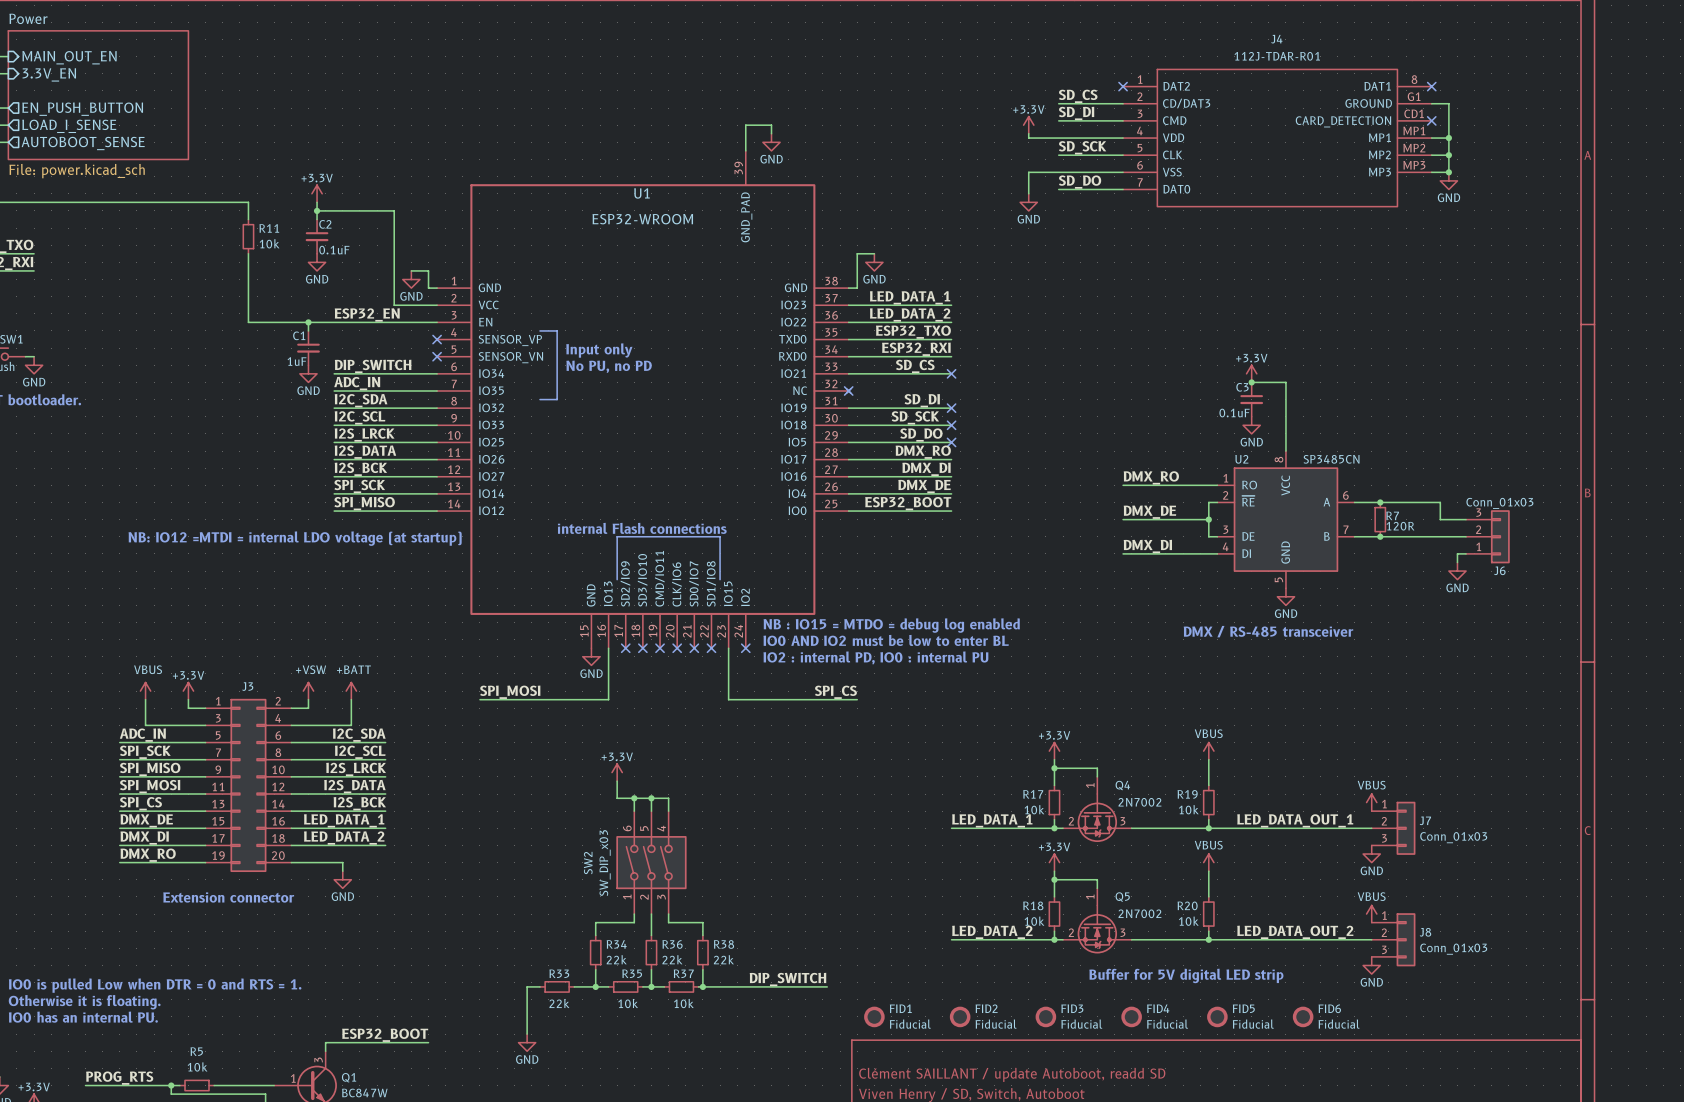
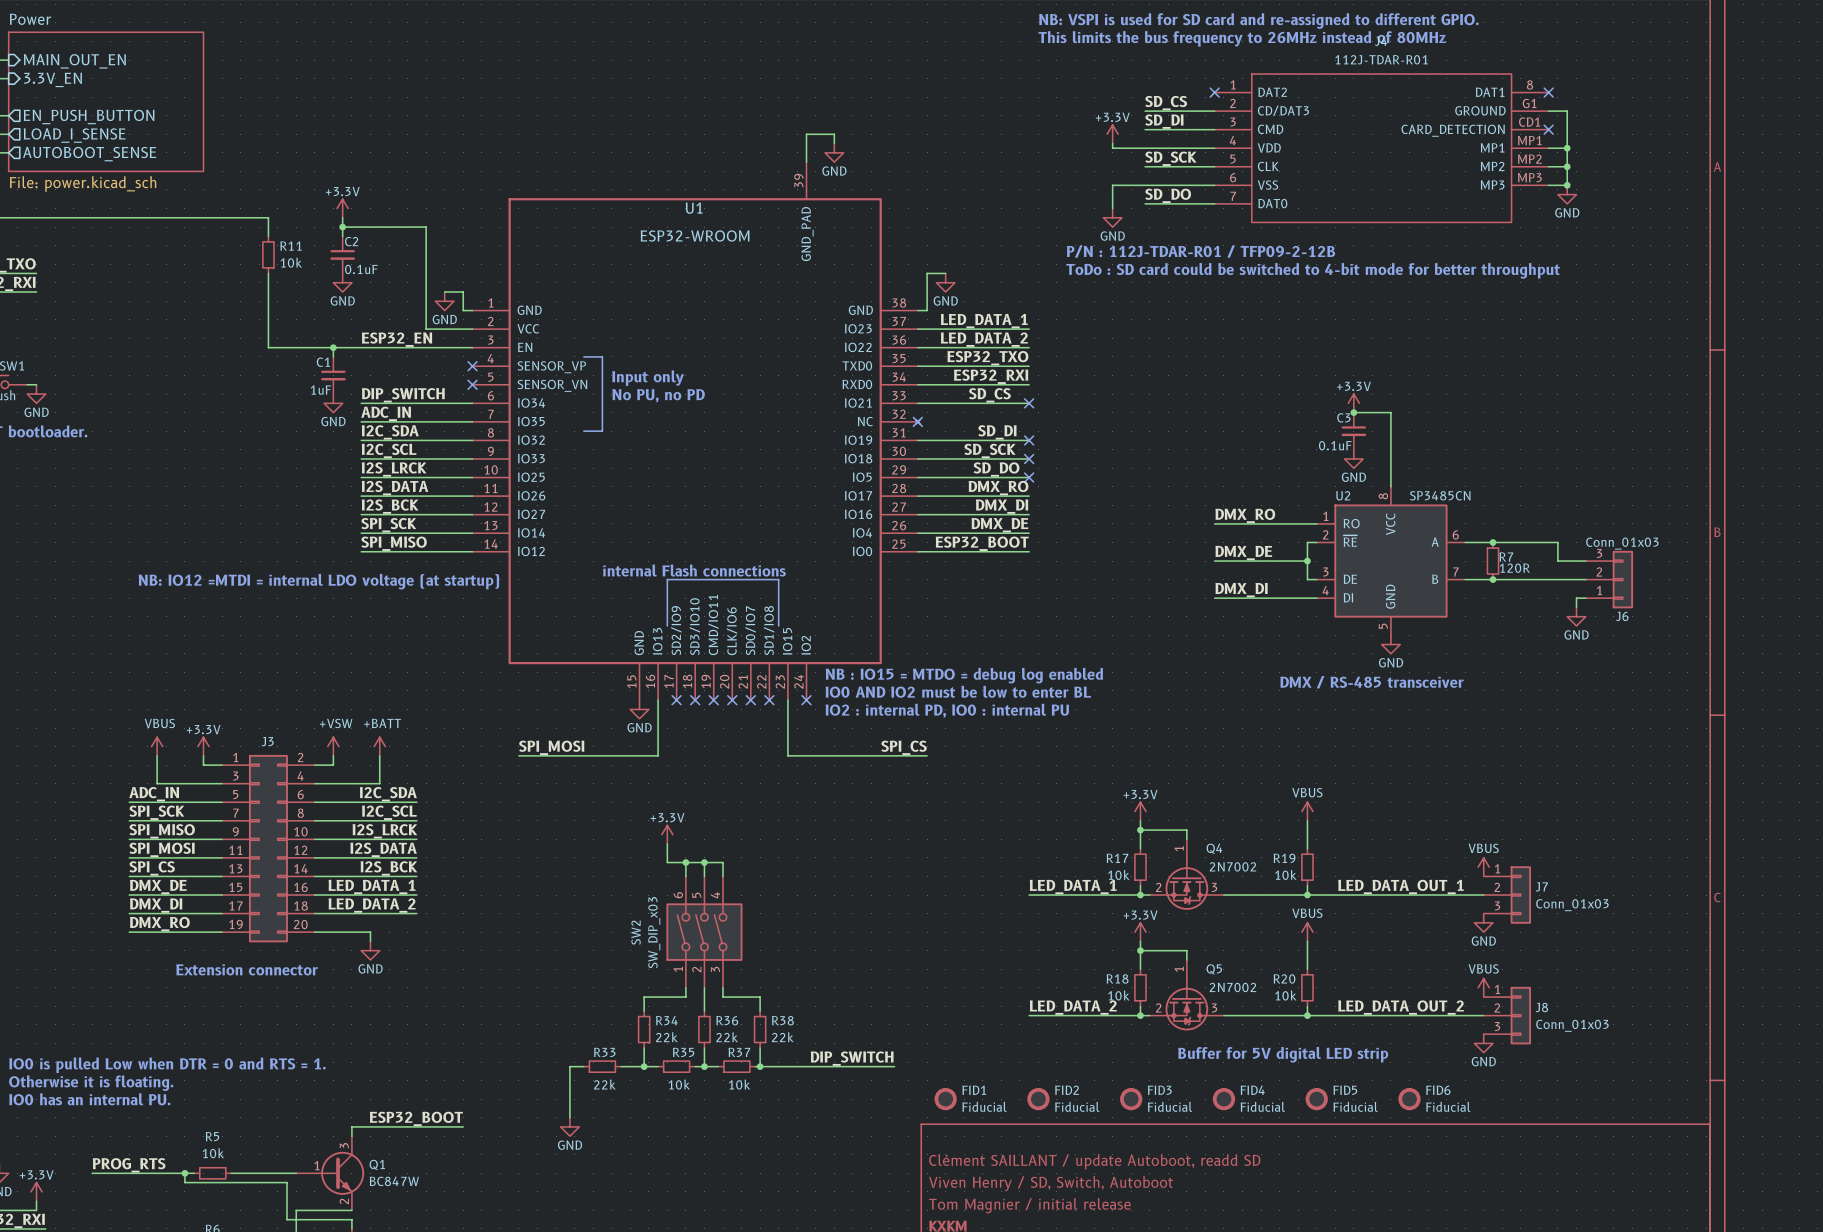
text: none -> NB: VSPI is used for SD card and re-assigned to different GPIO. (1258, 20)
text: none -> This limits the bus frequency to 26MHz instead of 80MHz (1242, 38)
text: none -> P/N : 112J-TDAR-R01 / TFP09-2-12B (1200, 251)
text: none -> ToDo : SD card could be switched to 4-bit mode for better throughput (1313, 270)

